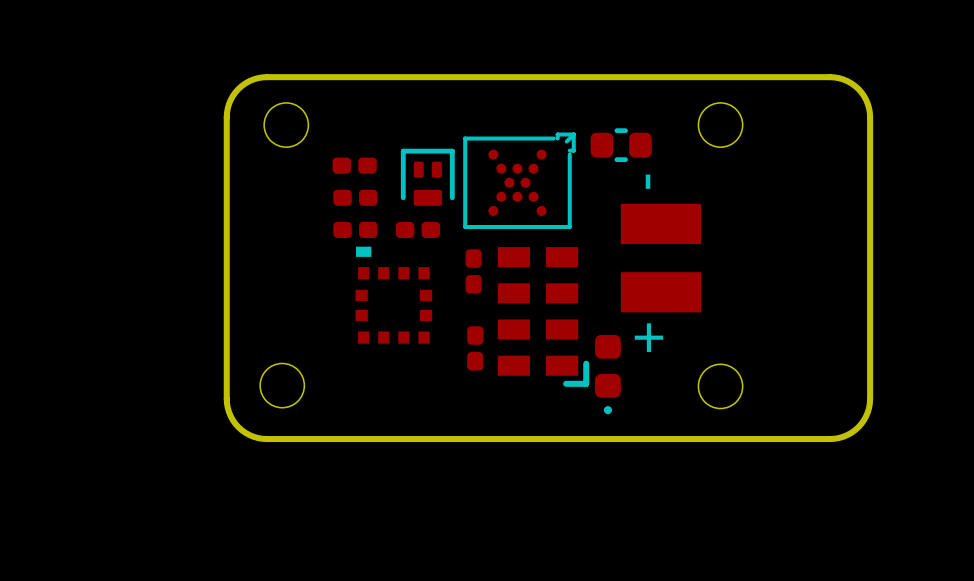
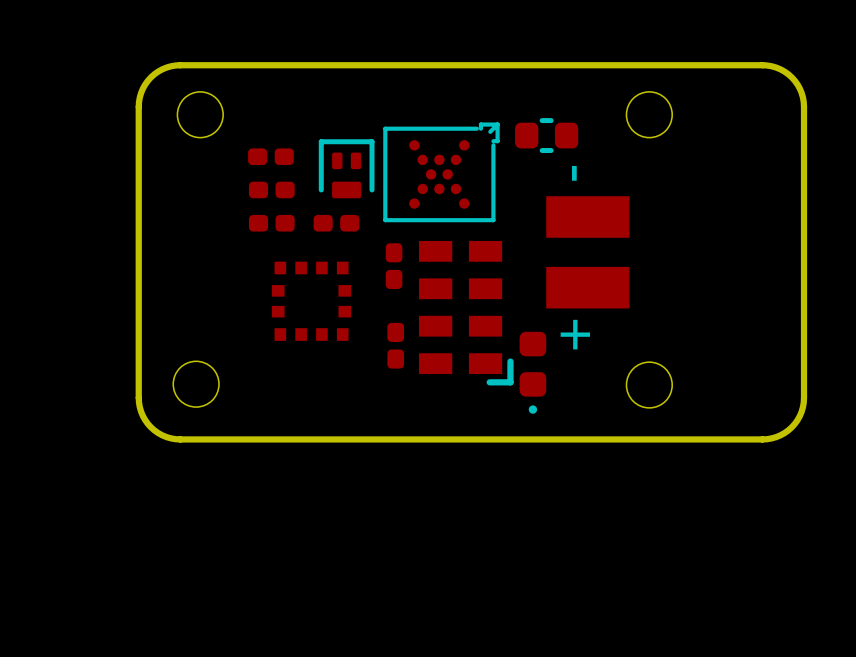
part footprint: [355, 246, 433, 344] -> [271, 261, 352, 341]

